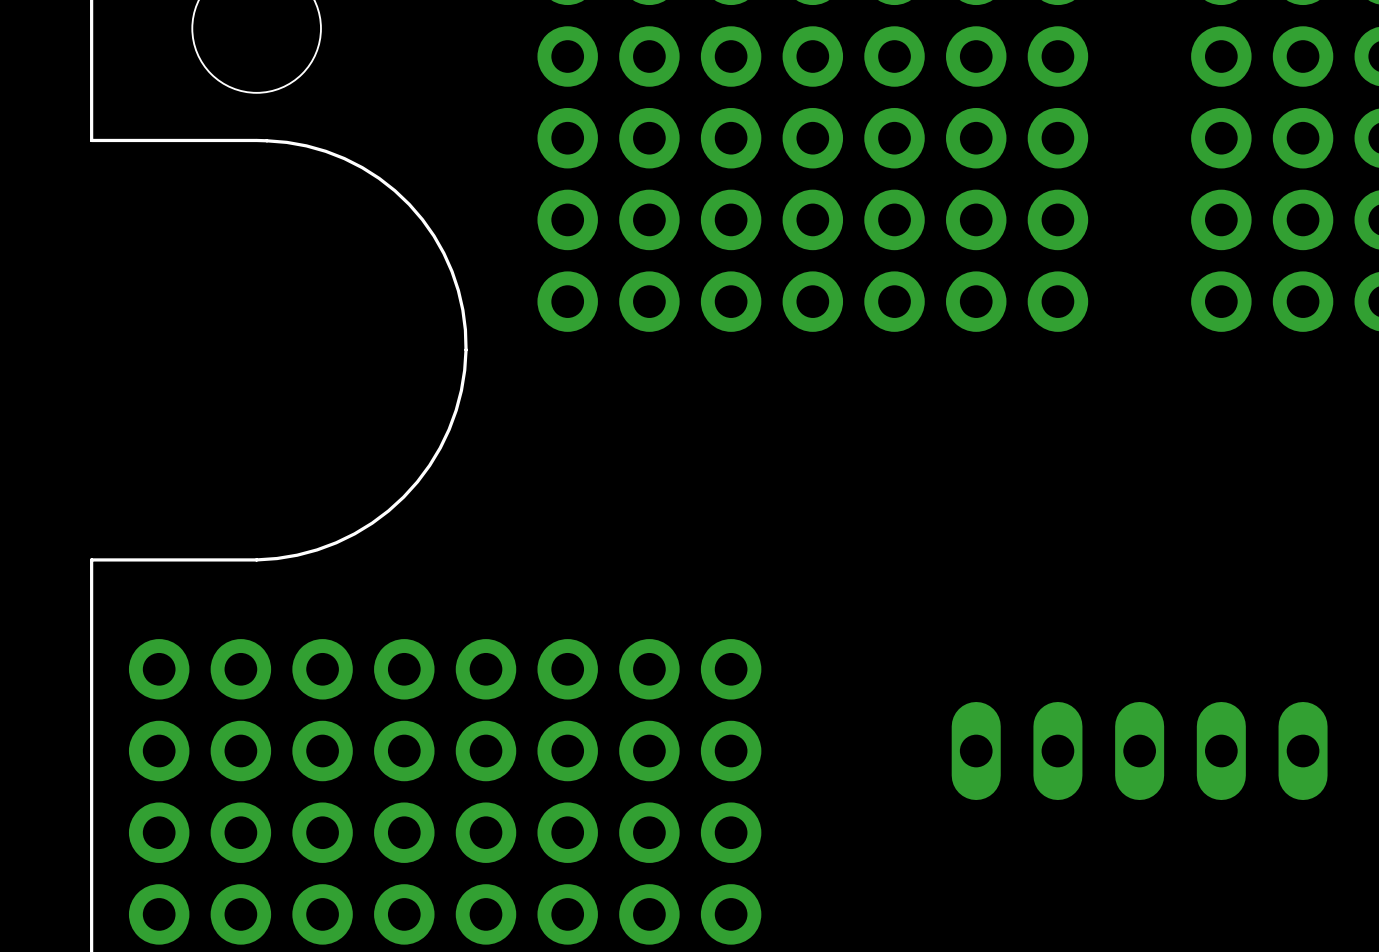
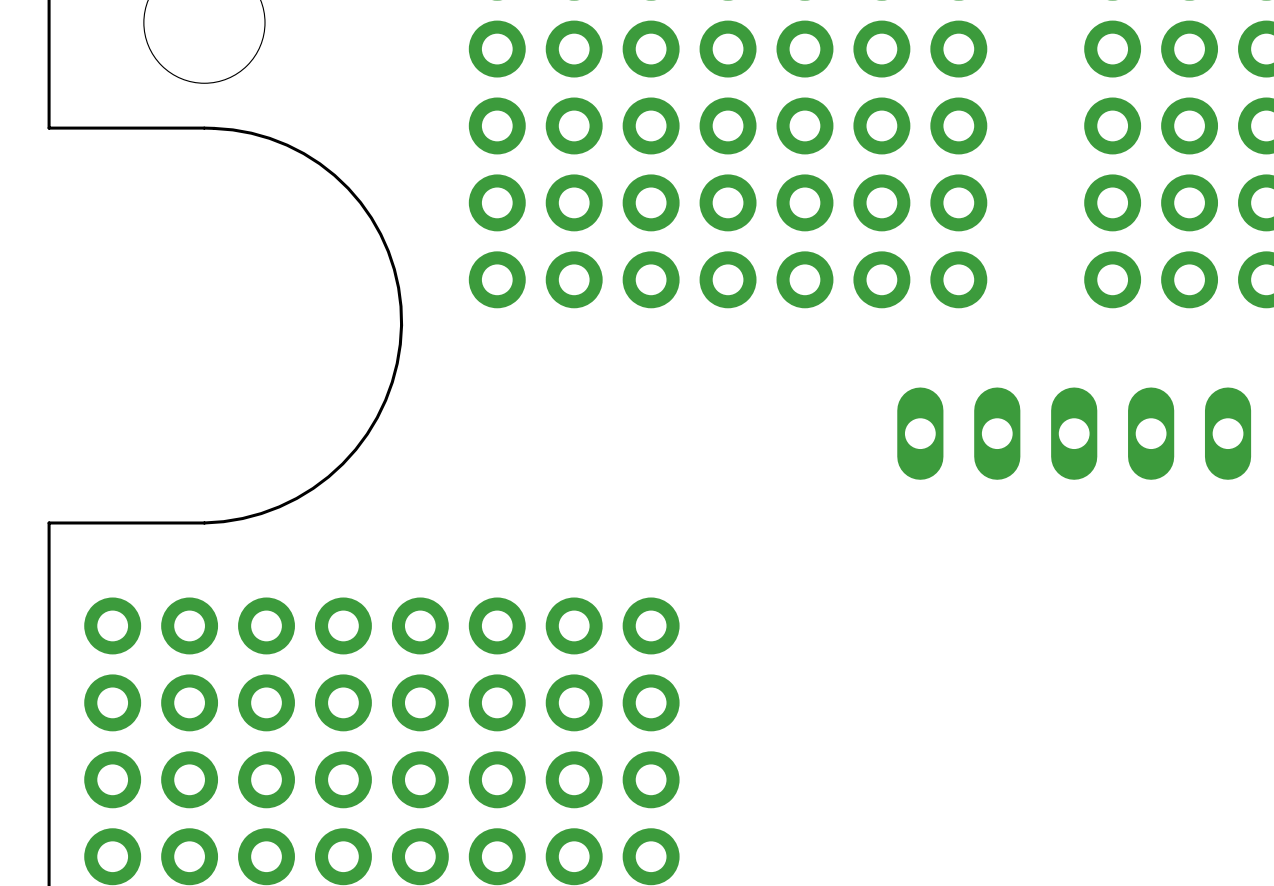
part position: (1139, 751) -> (1074, 433)

